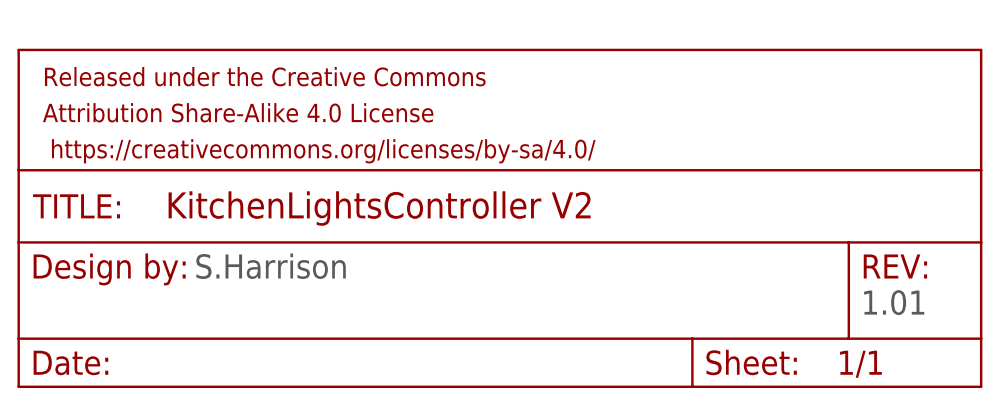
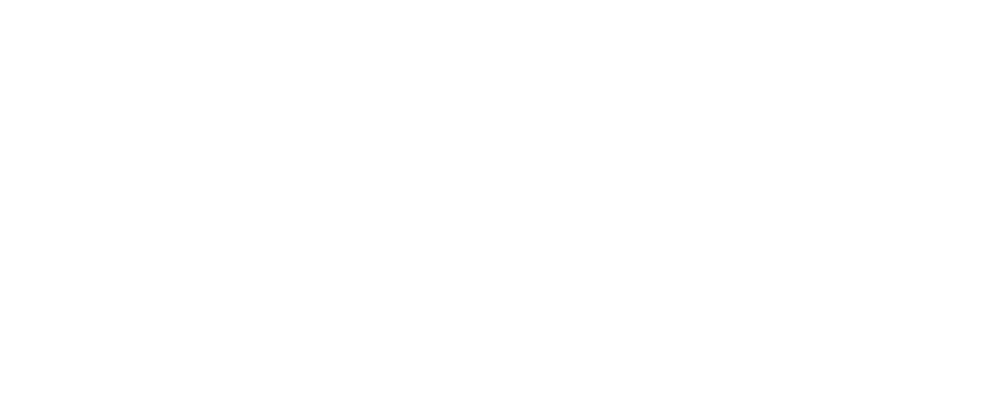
part: (499, 218) -> none
text: S.Harrison (271, 266) -> none
text: 1.01 (894, 302) -> none

